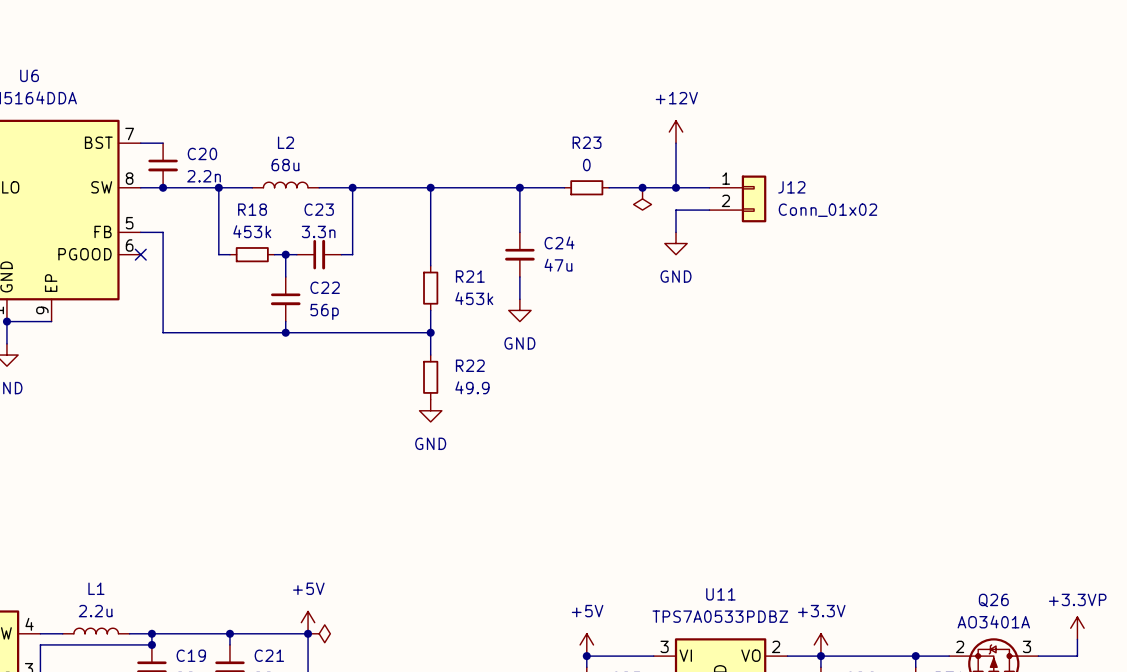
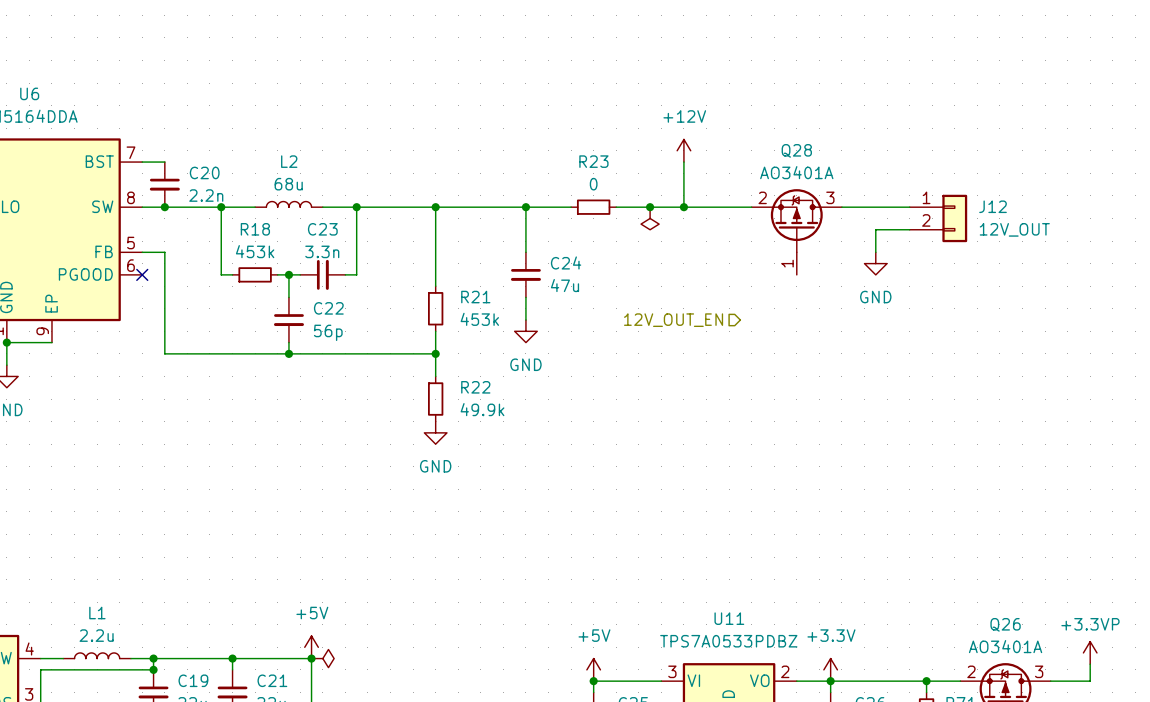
wire: none -> (841, 207) (909, 207)
J12 position: (737, 198) -> (938, 218)
wire: (709, 210) (676, 210) (676, 232) -> (909, 229) (875, 229) (875, 252)
J12 value: Conn_01x02 (827, 210) -> 12V_OUT (1014, 229)
Q28: none -> AO3401A (796, 232)
power symbol position: GND (676, 243) -> GND (875, 263)
hierarchical label: none -> 12V_OUT_EN (673, 320)
R22 value: 49.9 (472, 387) -> 49.9k (482, 409)

